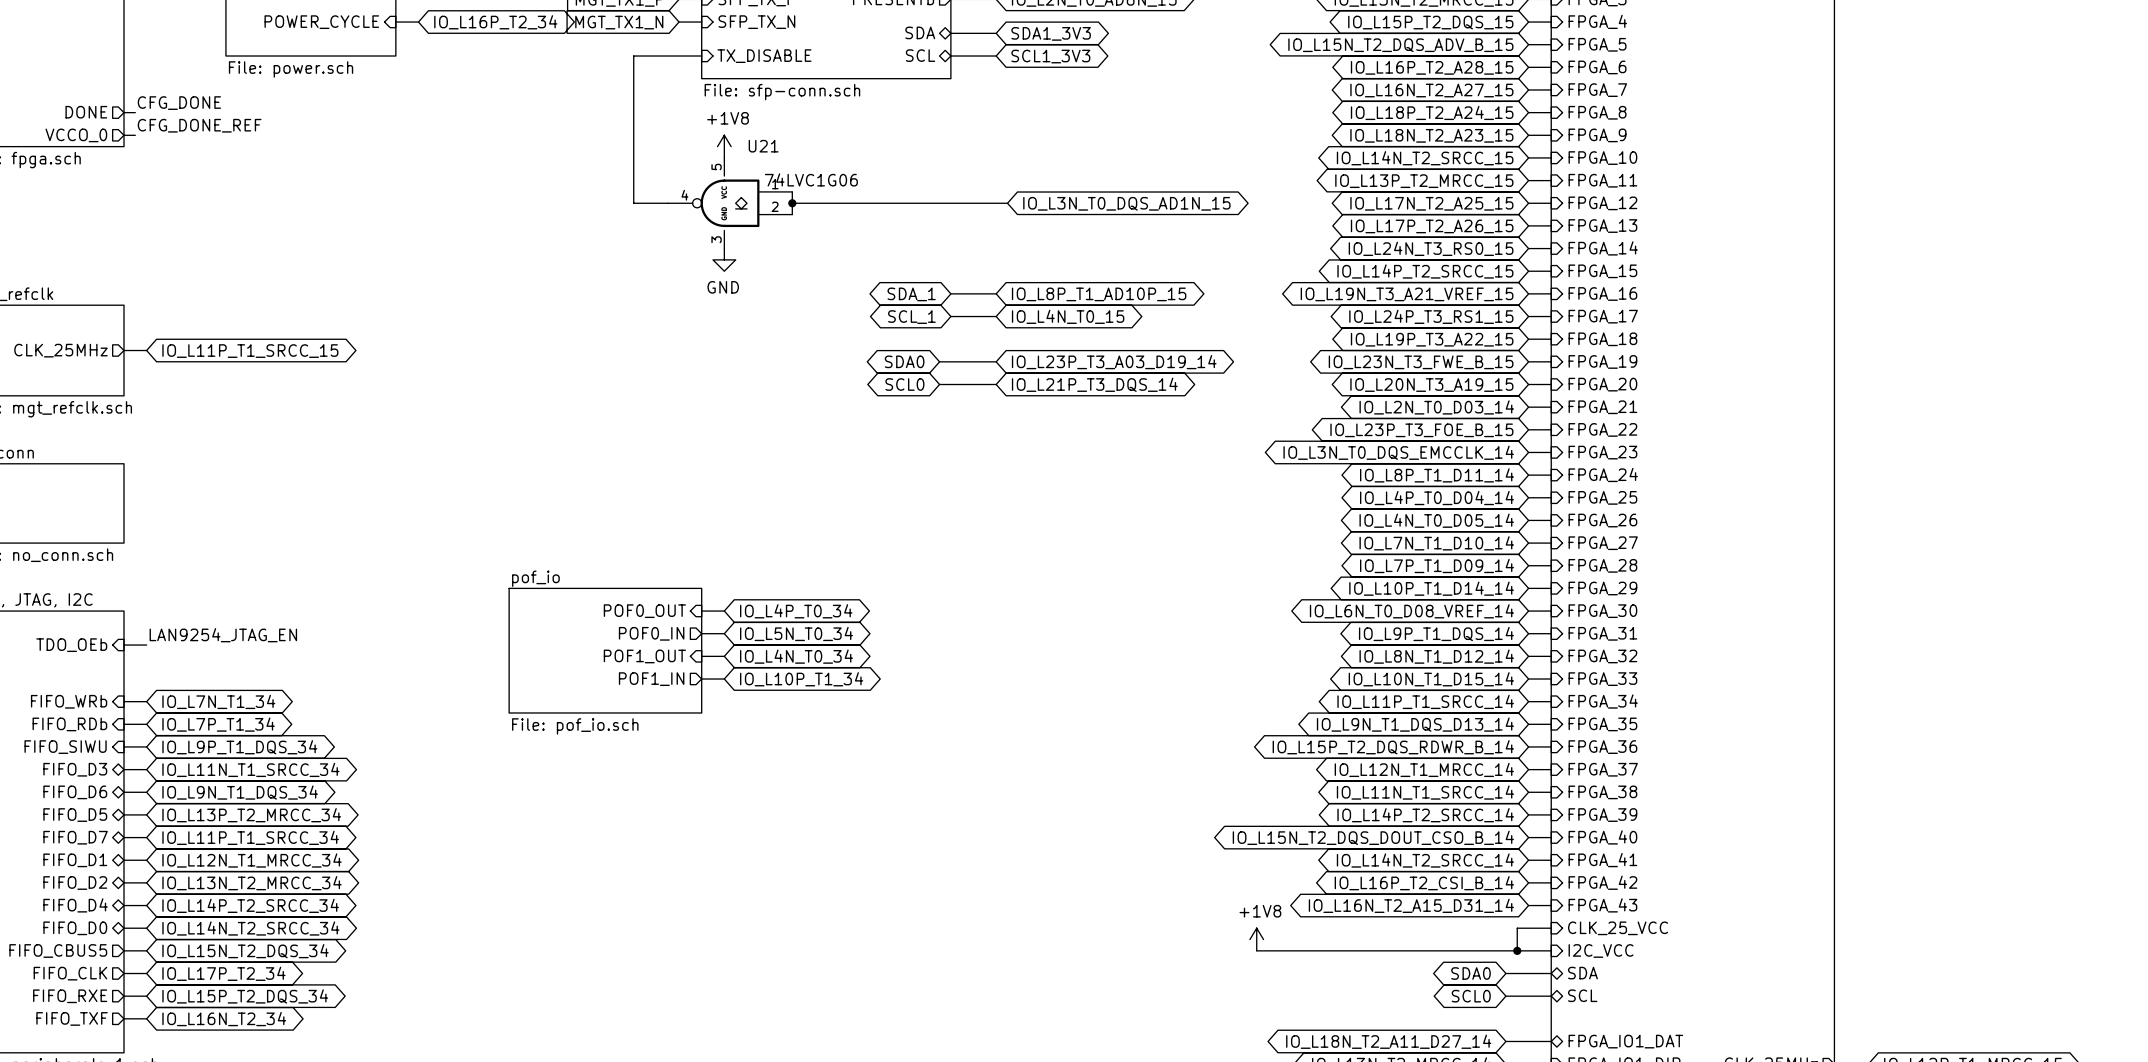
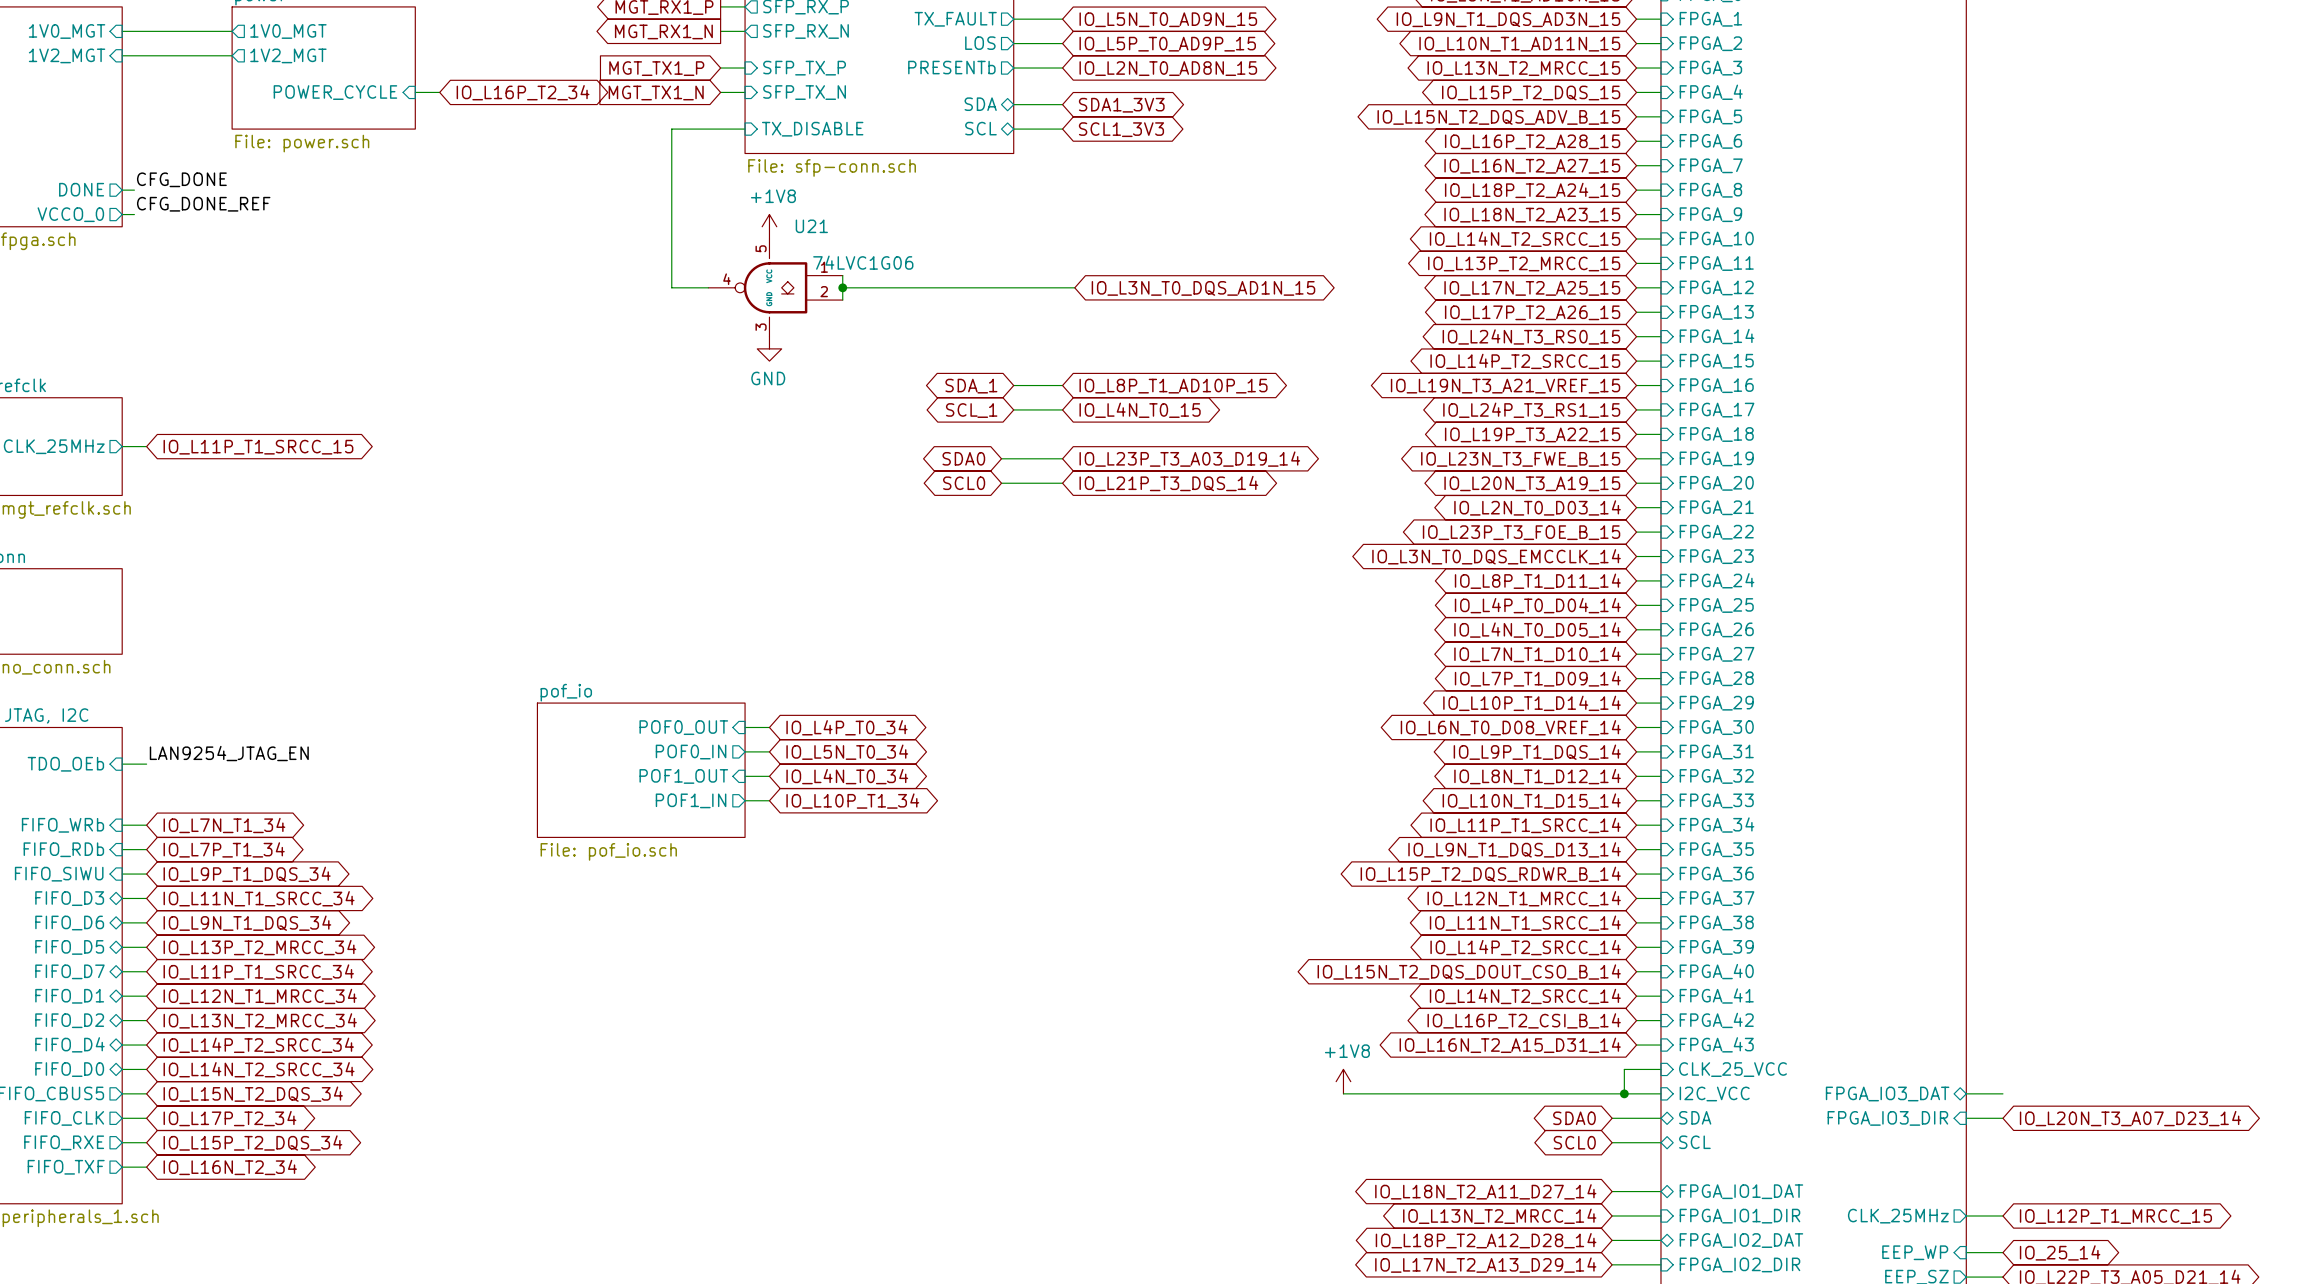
sheet pin: none -> FPGA_IO3_DAT (1887, 1093)
wire: none -> (1966, 1093) (2002, 1093)
sheet pin: none -> FPGA_IO3_DIR (1887, 1118)
wire: none -> (1966, 1118) (2002, 1118)
global label: none -> IO_L20N_T3_A07_D23_14 (2130, 1118)

